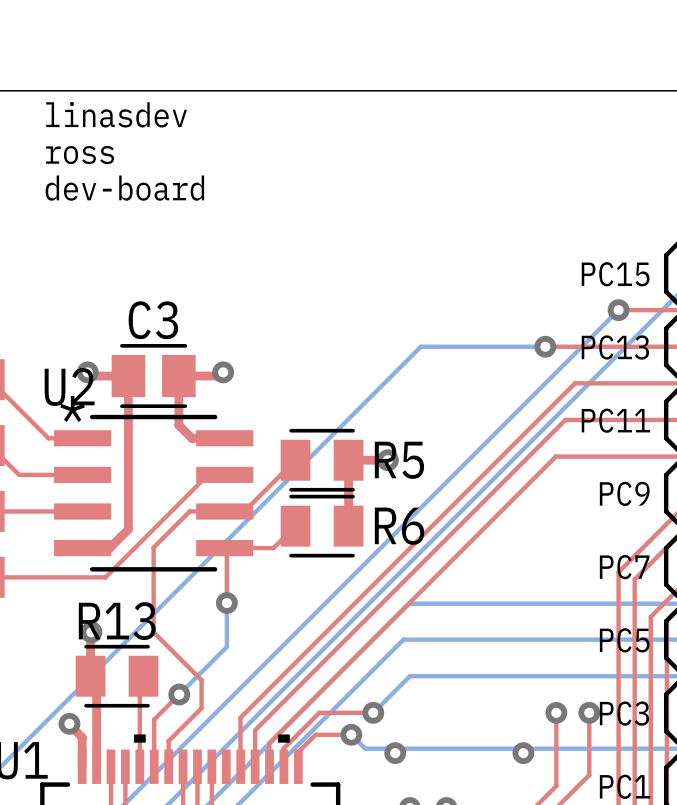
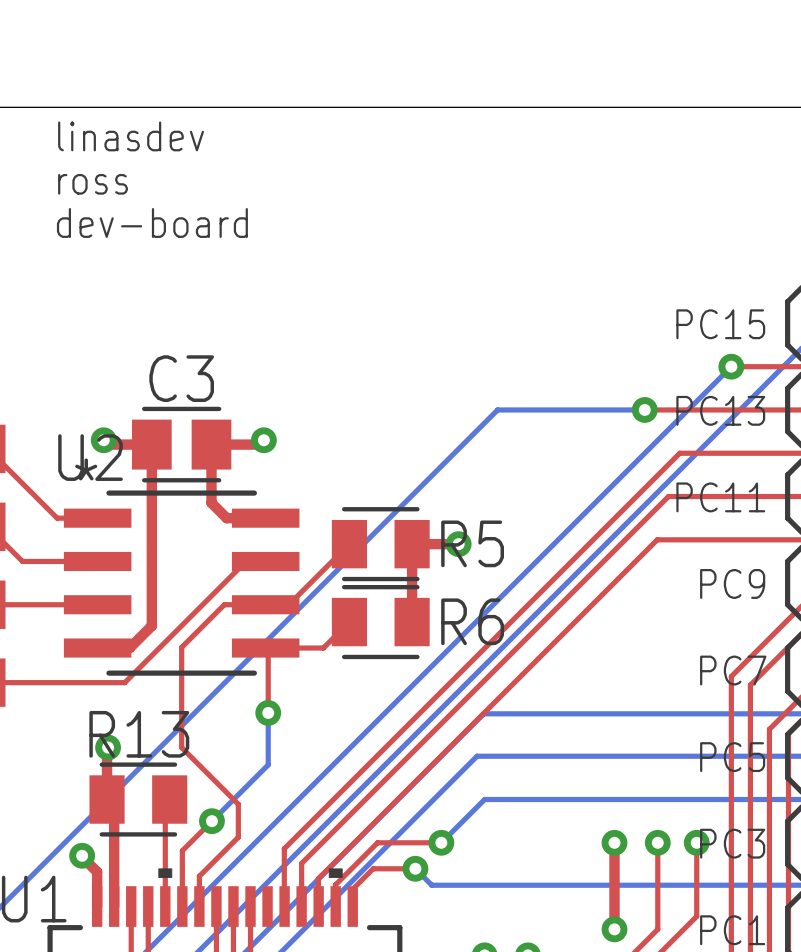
top track: none -> (614, 842) (614, 929)
via: none -> (614, 842)
via: (395, 753) -> none
via: (523, 753) -> none
via: none -> (614, 929)

